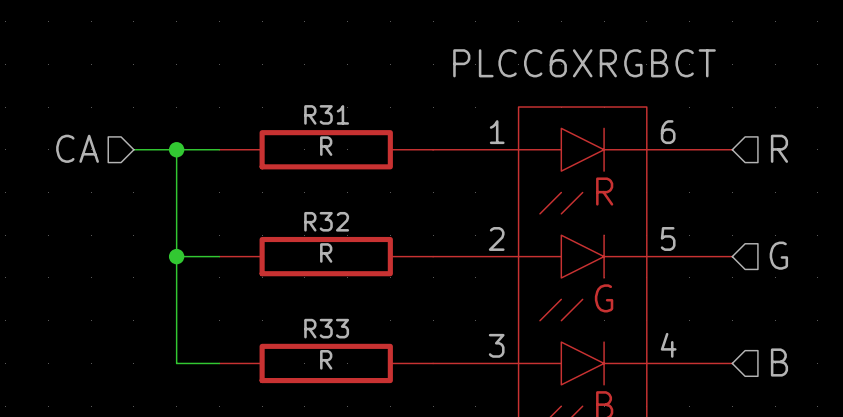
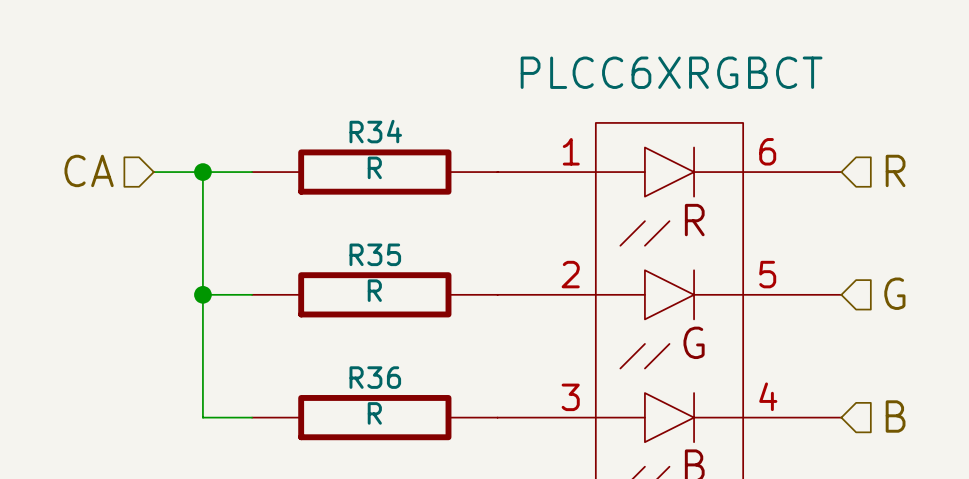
R31 name: R31 (326, 114) -> R34 (375, 131)
R32 name: R32 (326, 221) -> R35 (375, 254)
R33 name: R33 (326, 328) -> R36 (375, 377)

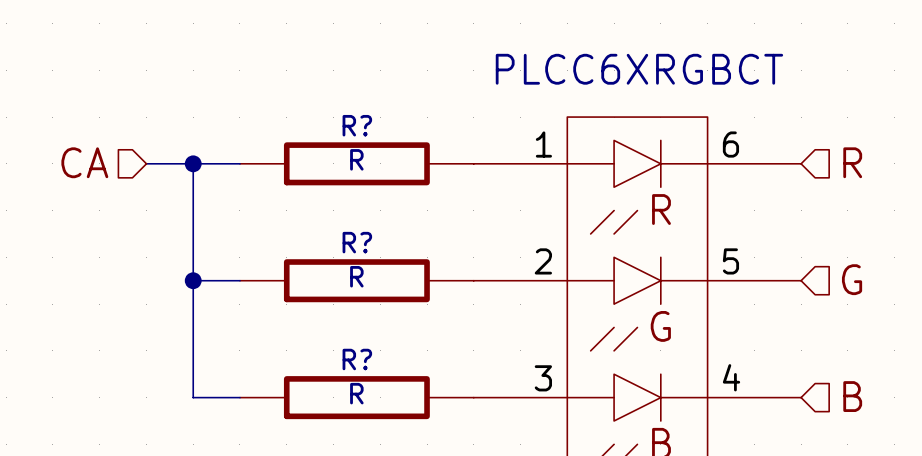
R34 name: R34 (375, 131) -> R? (357, 125)
R35 name: R35 (375, 254) -> R? (357, 242)
R36 name: R36 (375, 377) -> R? (357, 359)

